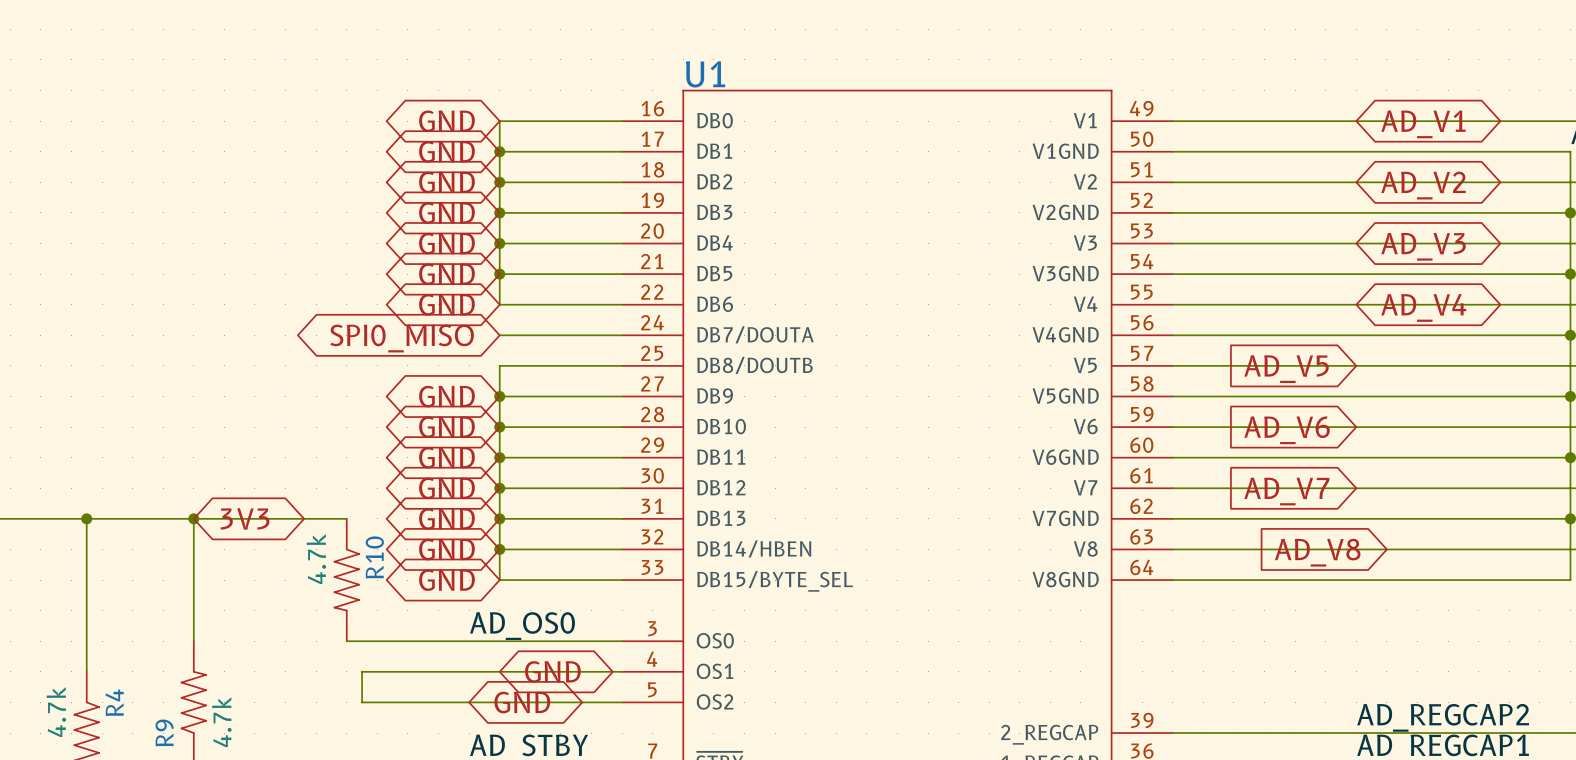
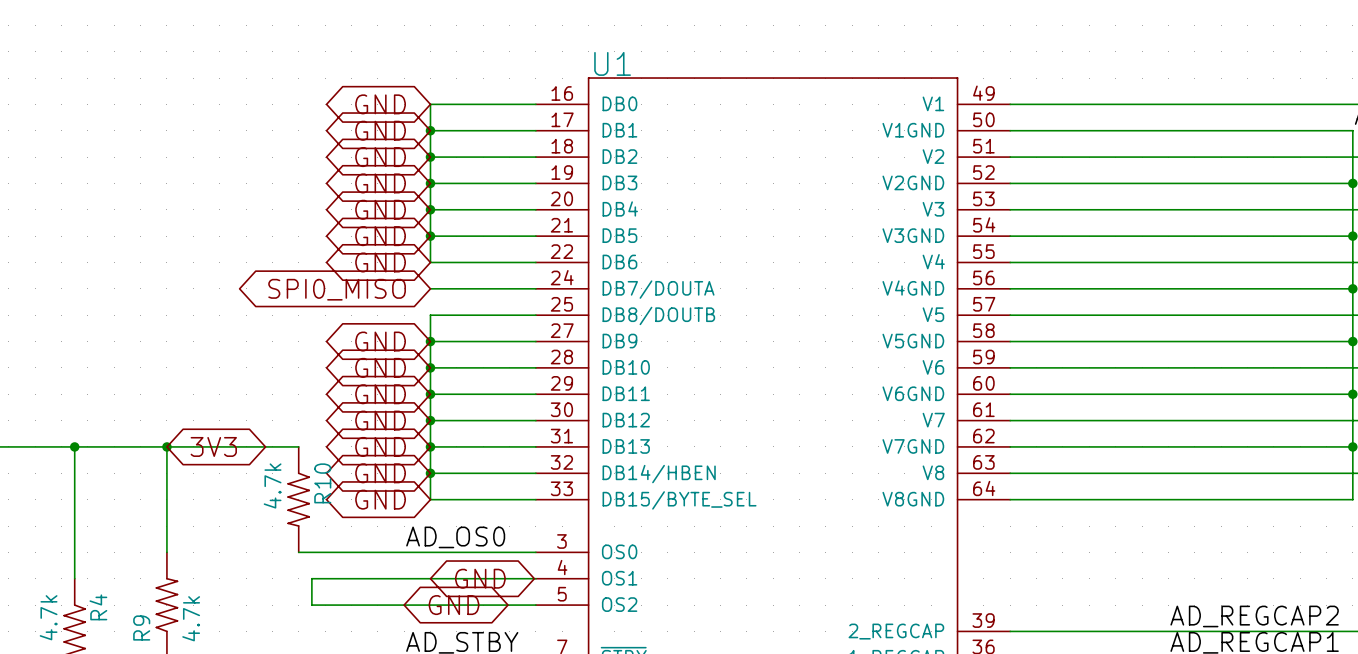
global label: AD_V1 (1423, 124) -> none
global label: AD_V2 (1423, 185) -> none
global label: AD_V3 (1423, 246) -> none
global label: AD_V4 (1423, 307) -> none
global label: AD_V5 (1286, 369) -> none
global label: AD_V6 (1287, 430) -> none
global label: AD_V7 (1286, 491) -> none
global label: AD_V8 (1317, 552) -> none

